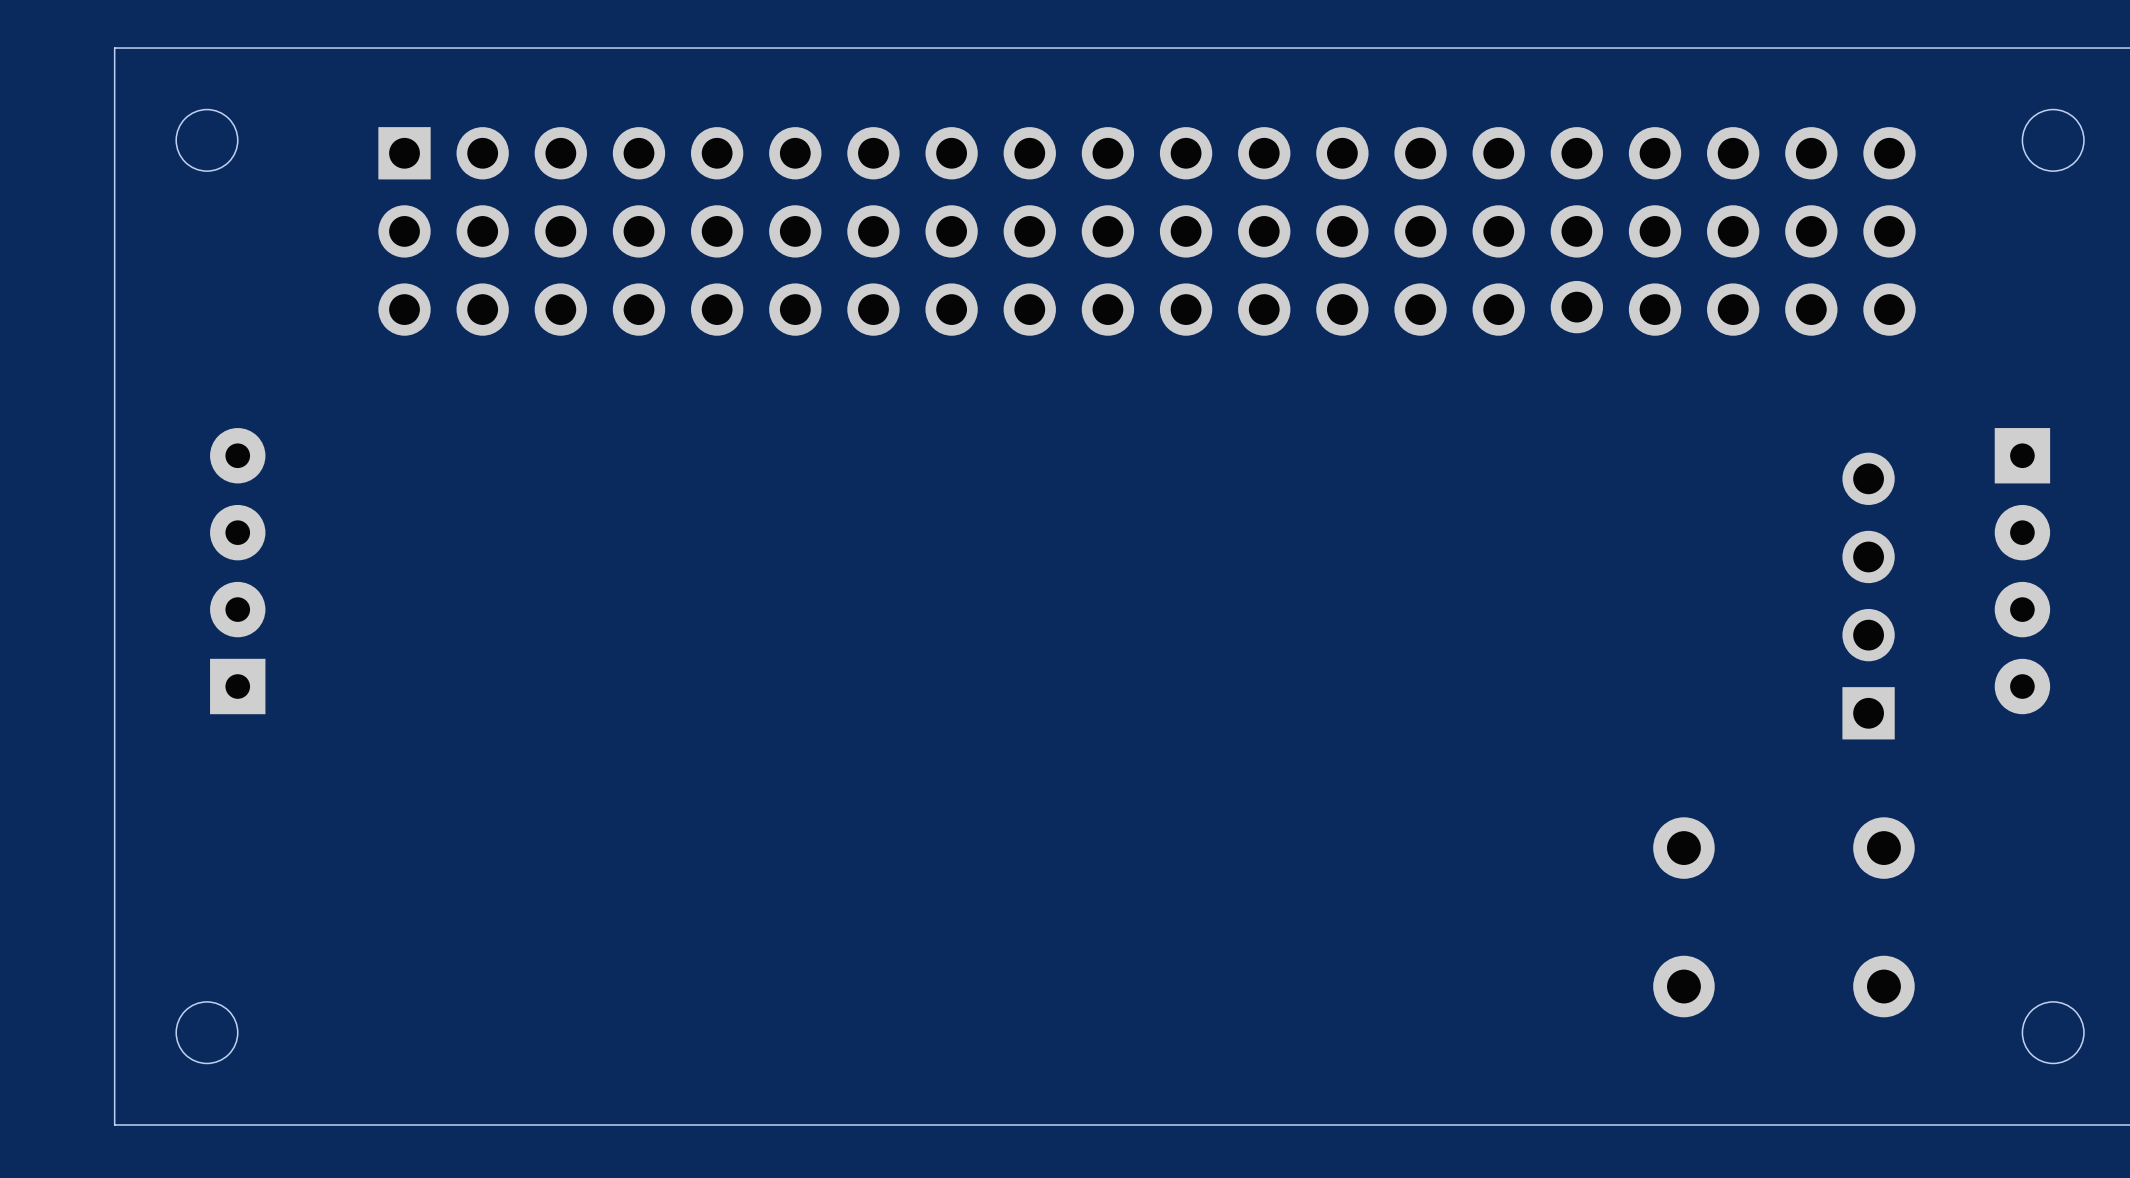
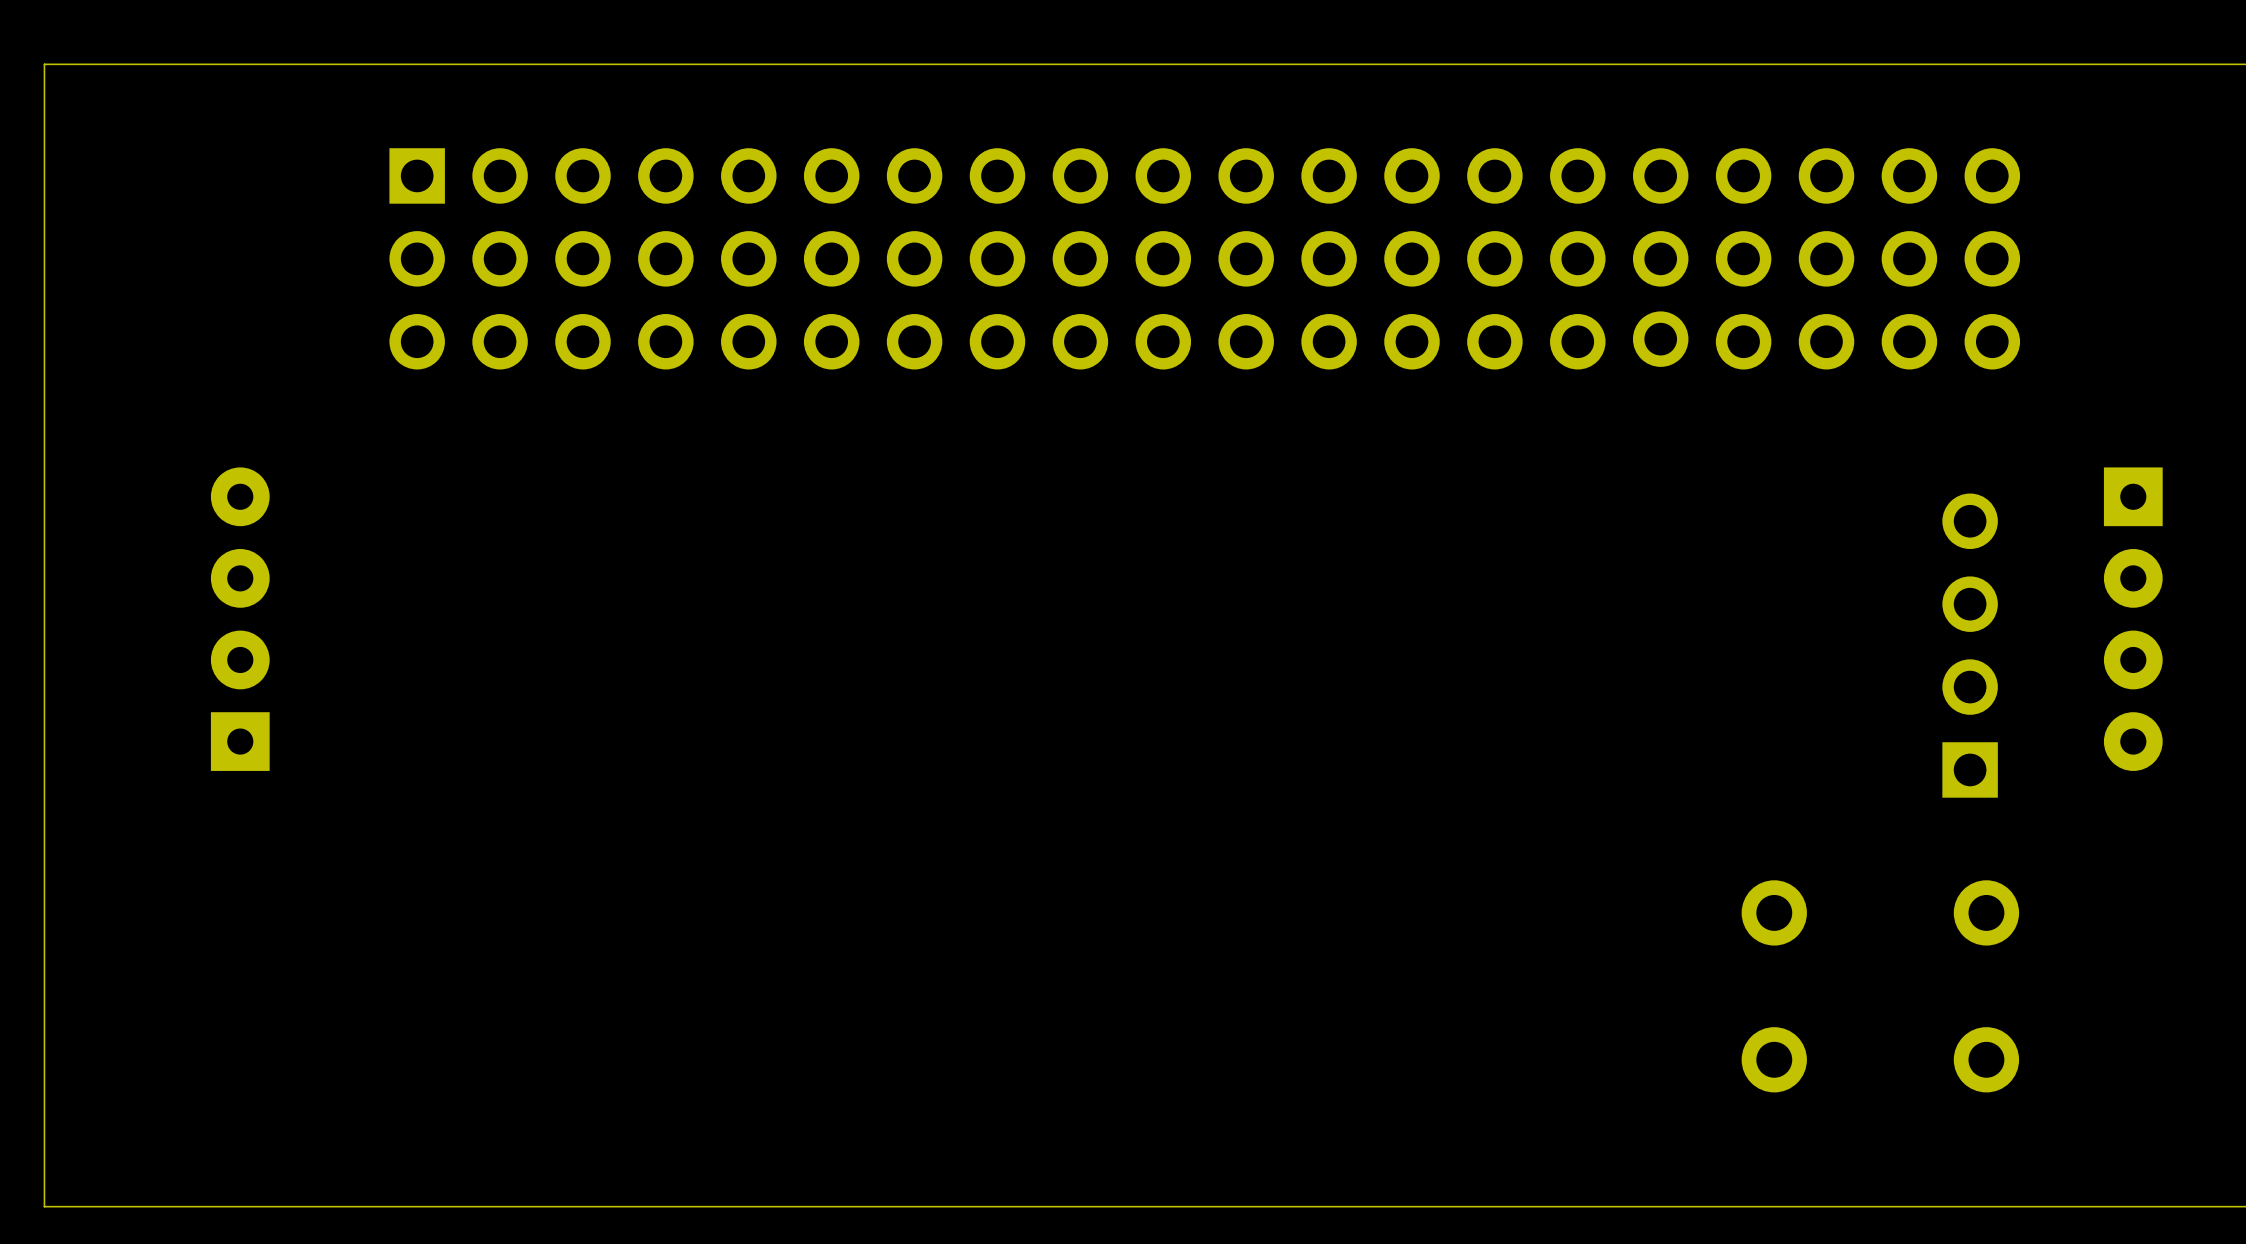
board edge: (114, 48) (114, 1124) -> (109, 64) (44, 64) (44, 1206) (109, 1206)
round board edge: [175, 108, 239, 172] -> none
round board edge: [2021, 108, 2085, 172] -> none
round board edge: [175, 1001, 239, 1065] -> none
round board edge: [2021, 1001, 2085, 1065] -> none

